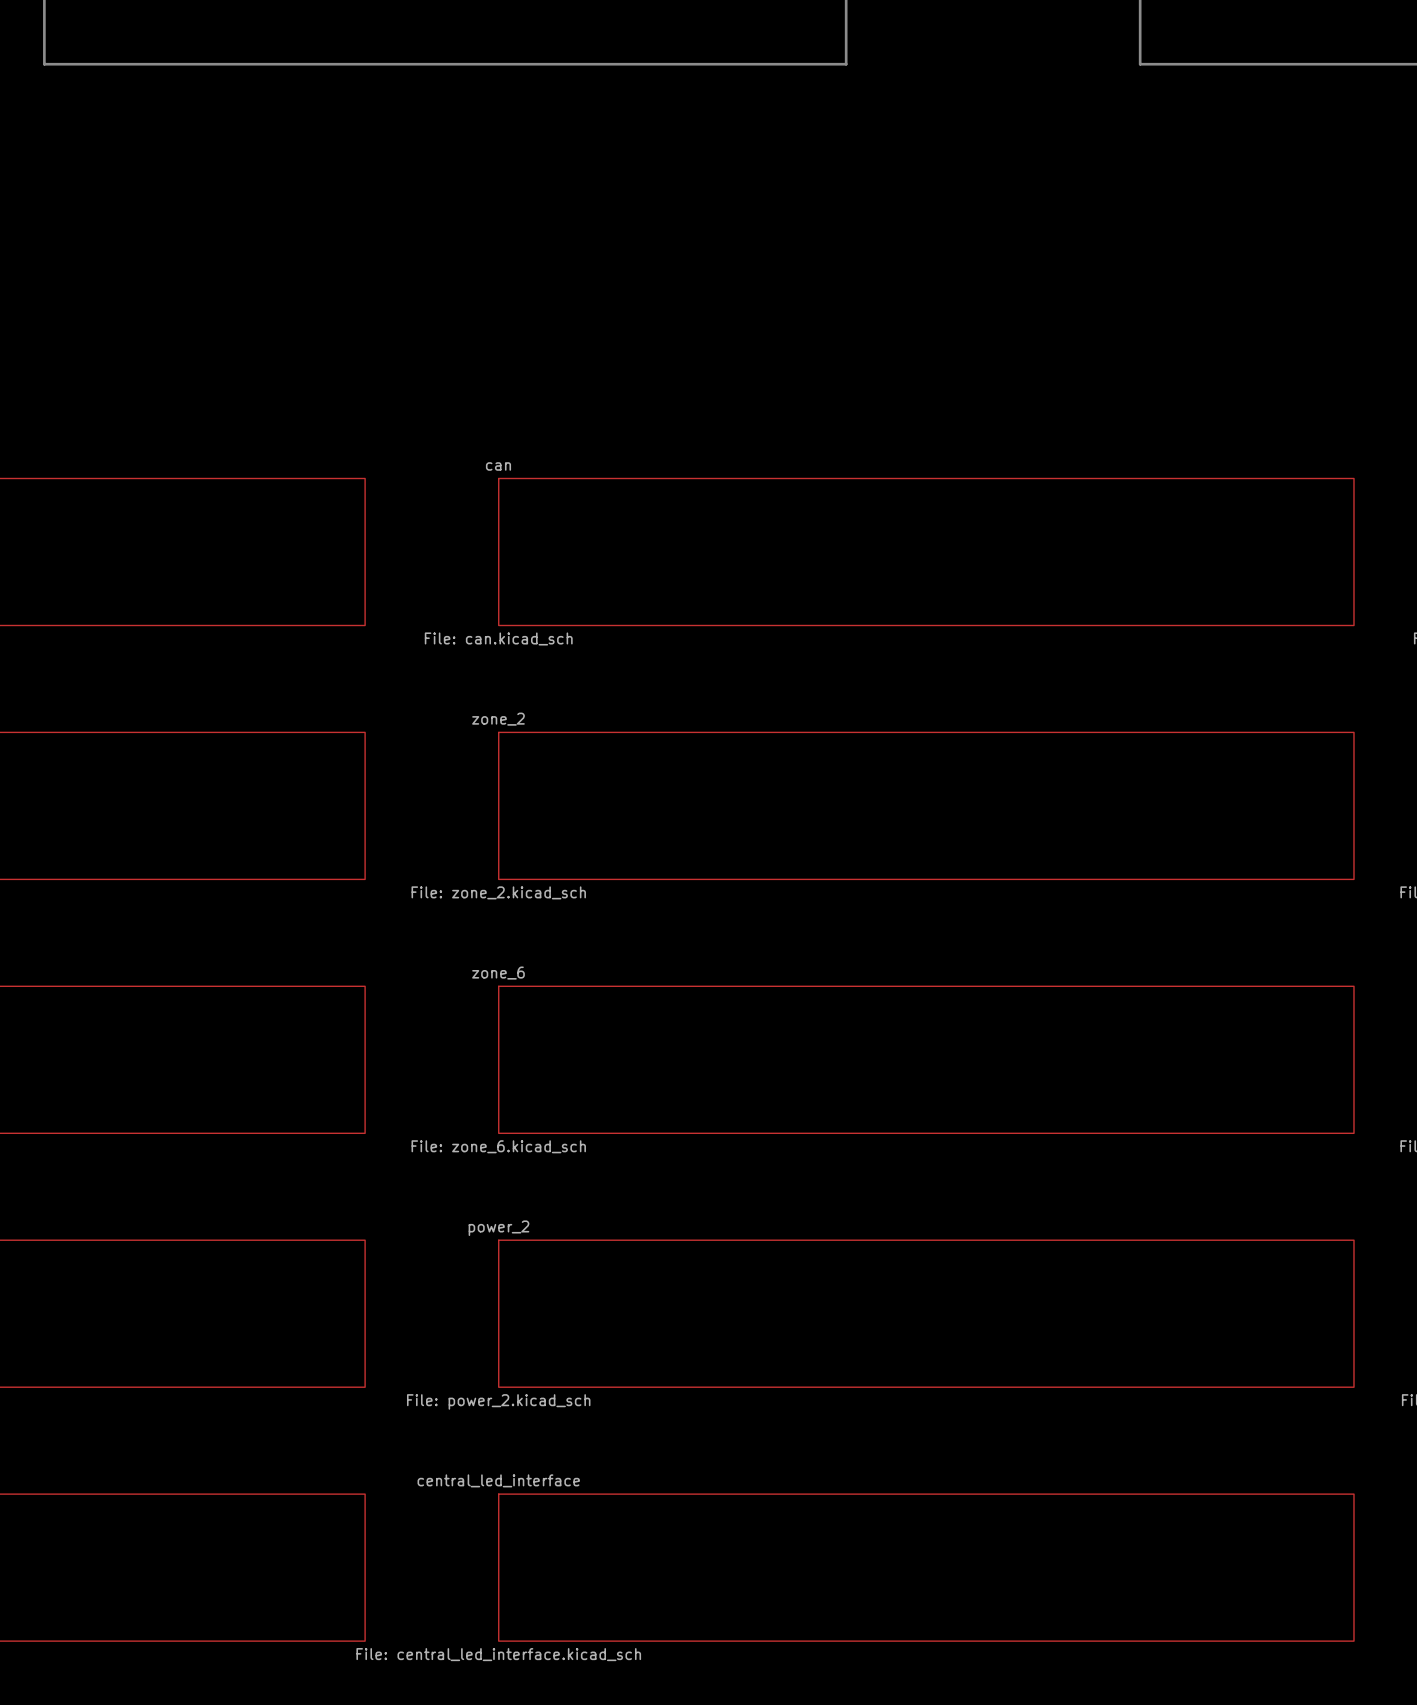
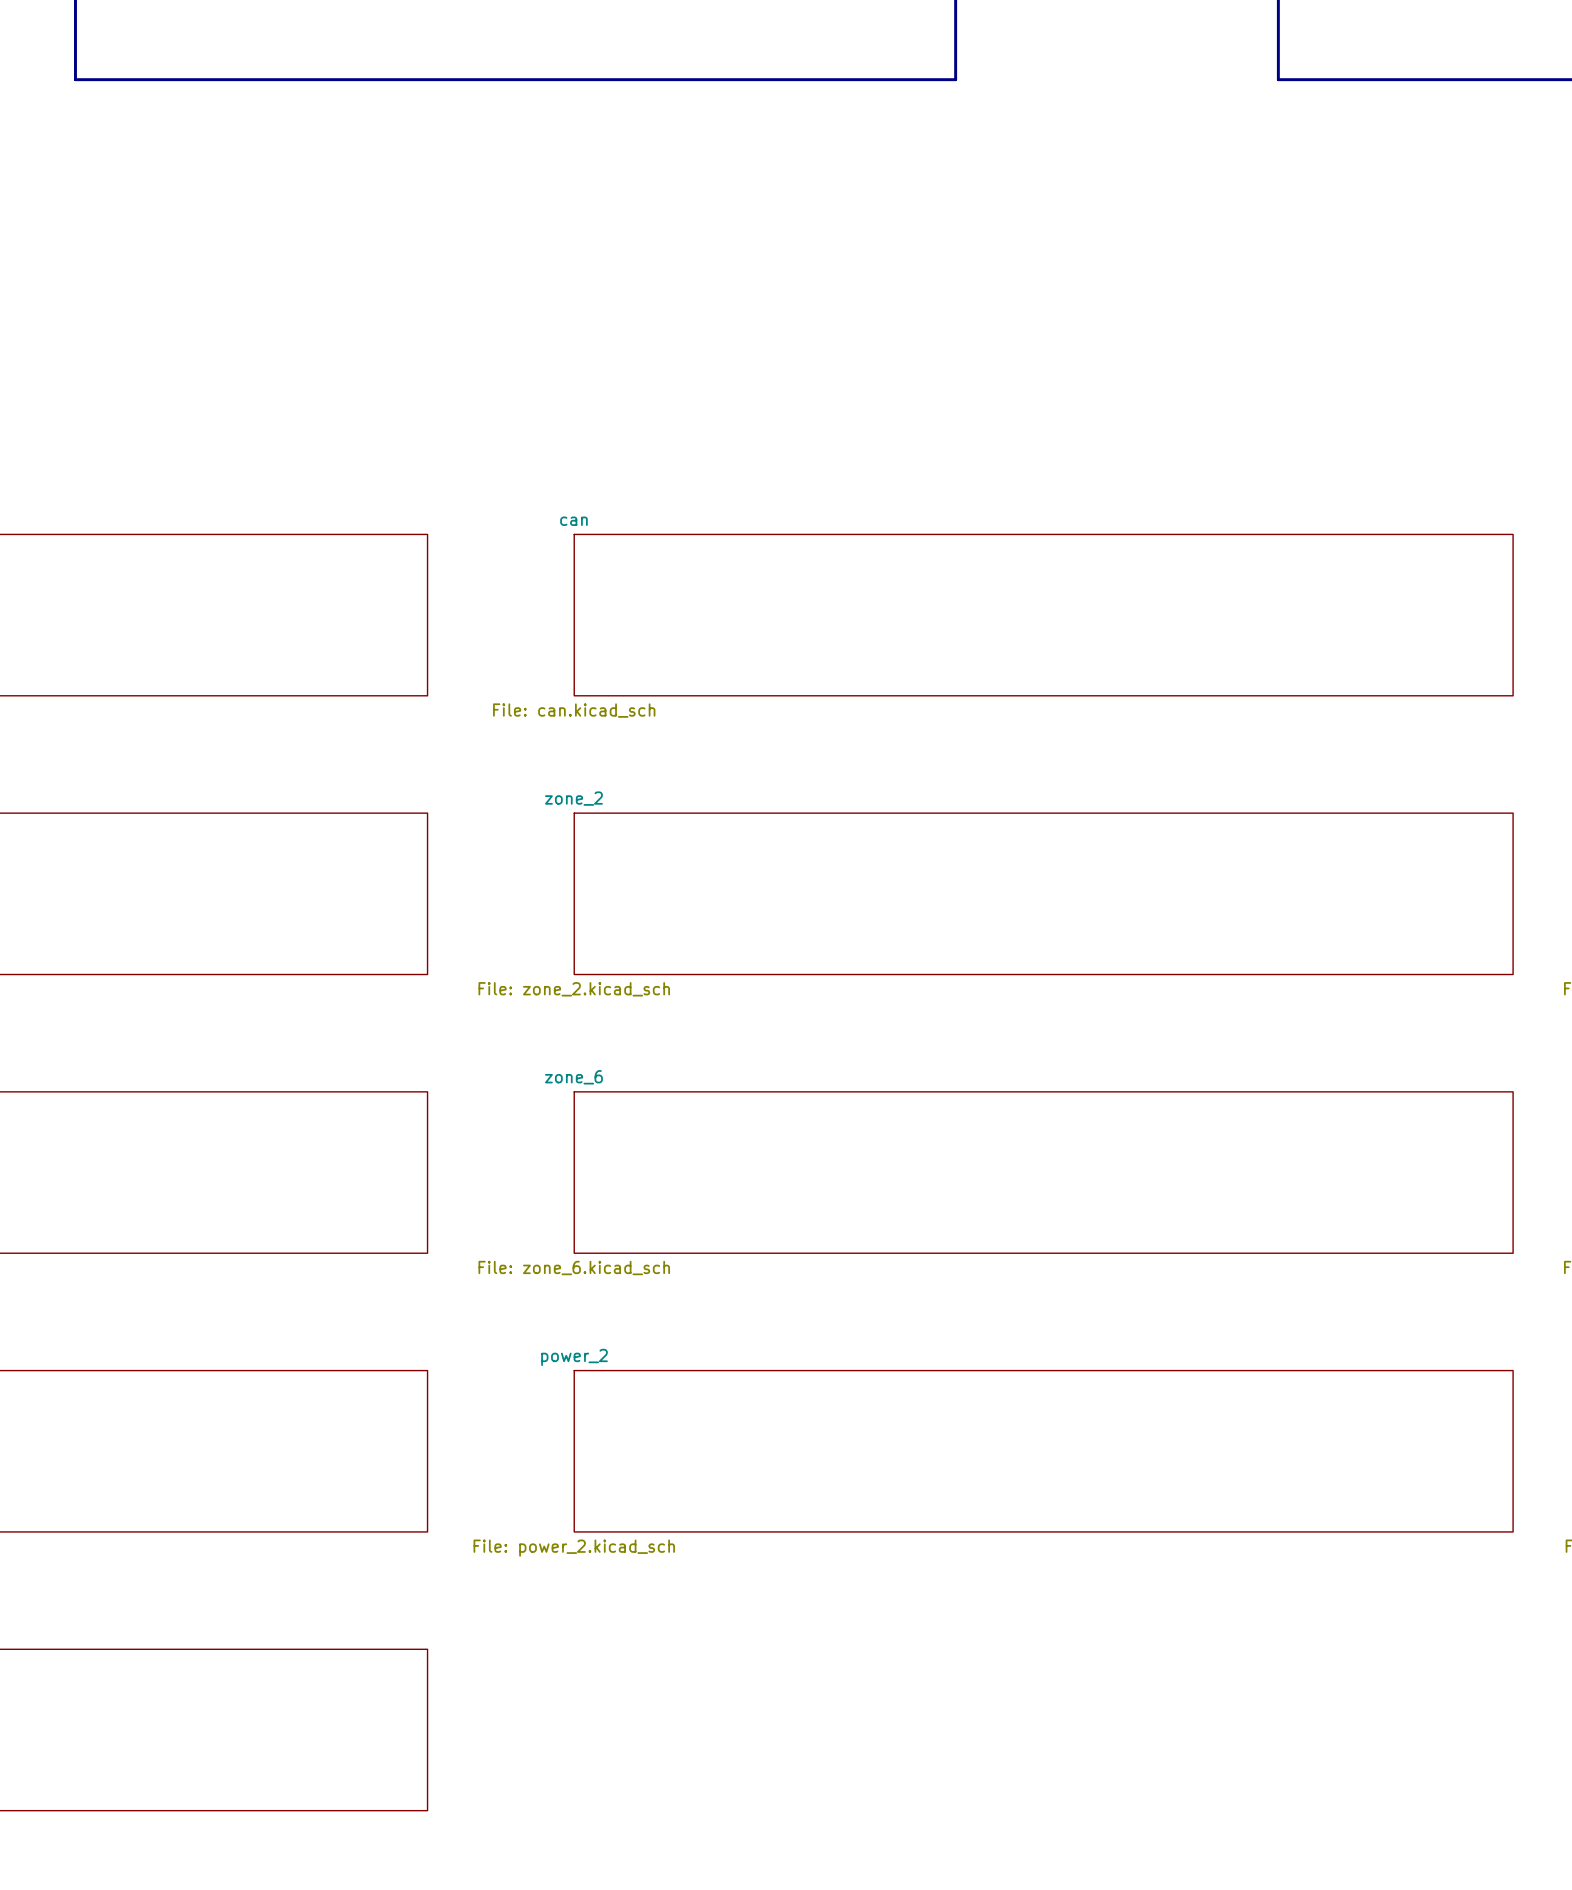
sheet central_led_interface: File: central_led_interface.kicad_sch (926, 1567) -> none

